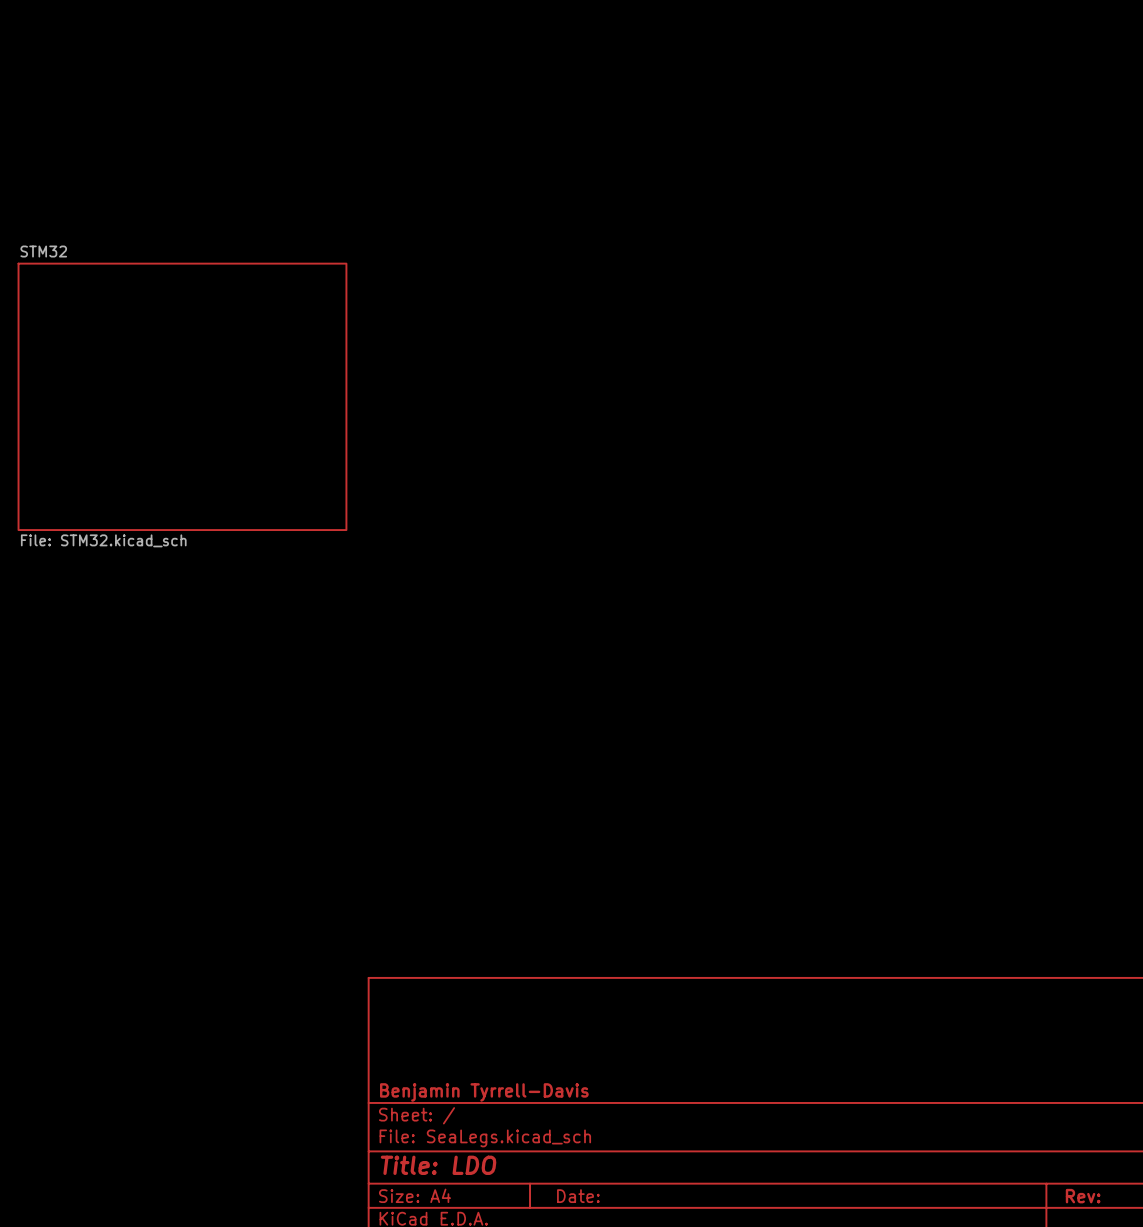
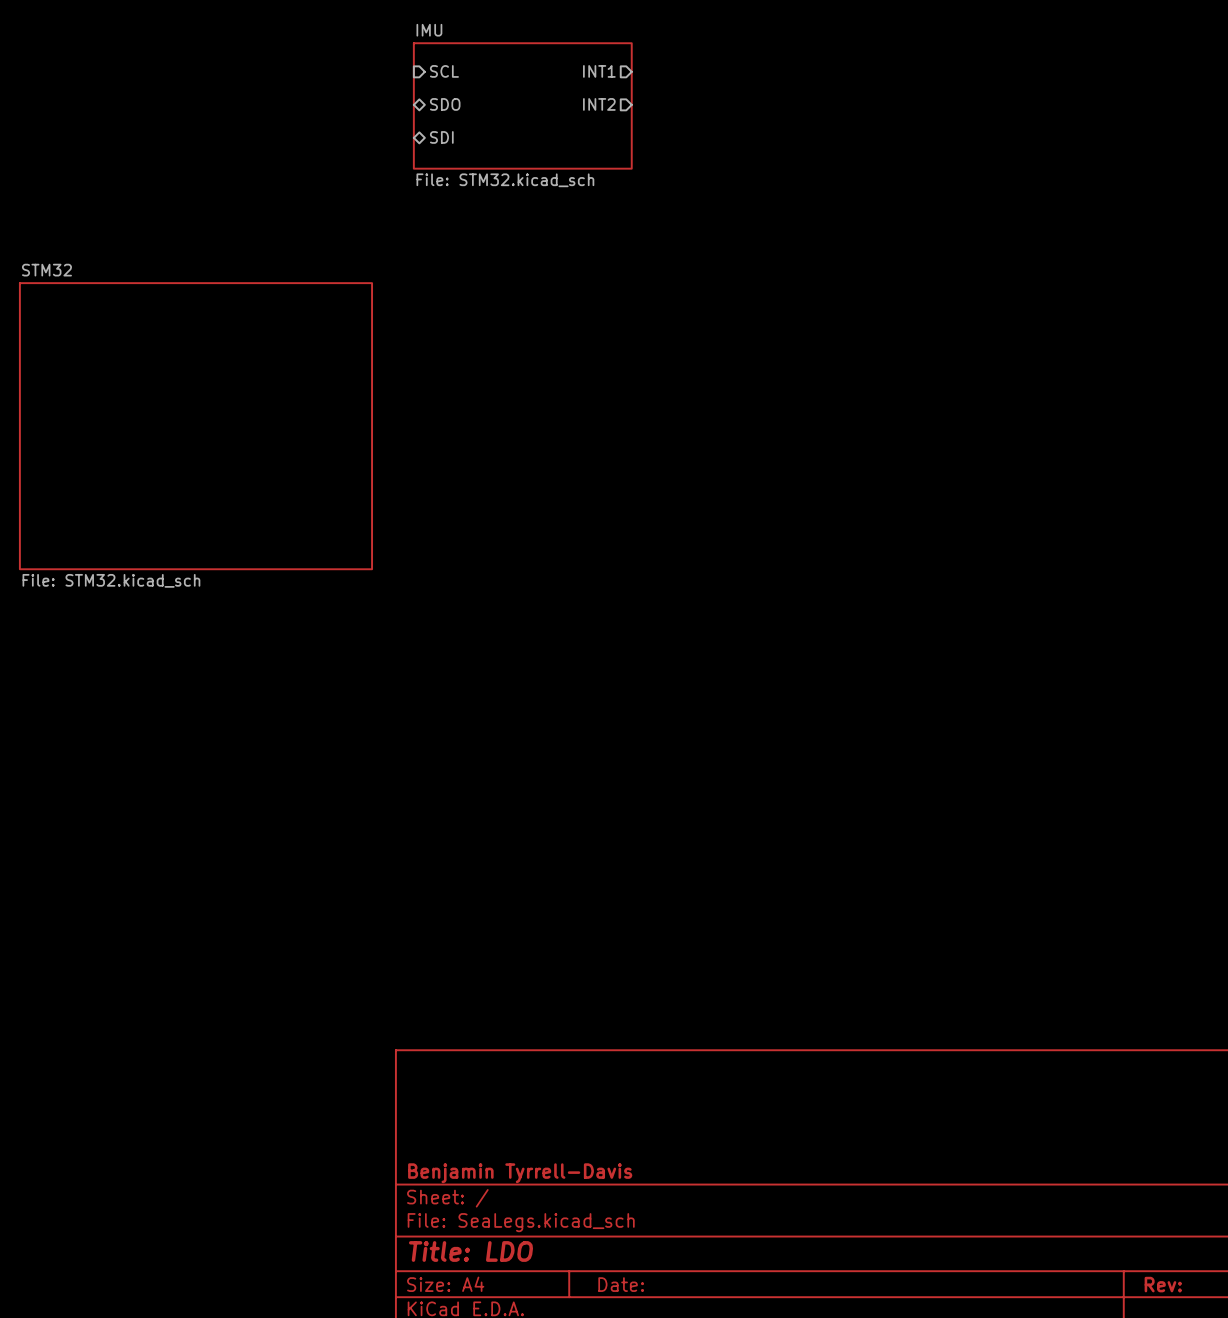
sheet pin: none -> SCL (444, 71)
sheet pin: none -> INT1 (599, 71)
sheet pin: none -> SDO (445, 104)
sheet pin: none -> INT2 (599, 104)
sheet IMU: none -> File: STM32.kicad_sch (522, 105)
sheet pin: none -> SDI (441, 137)

